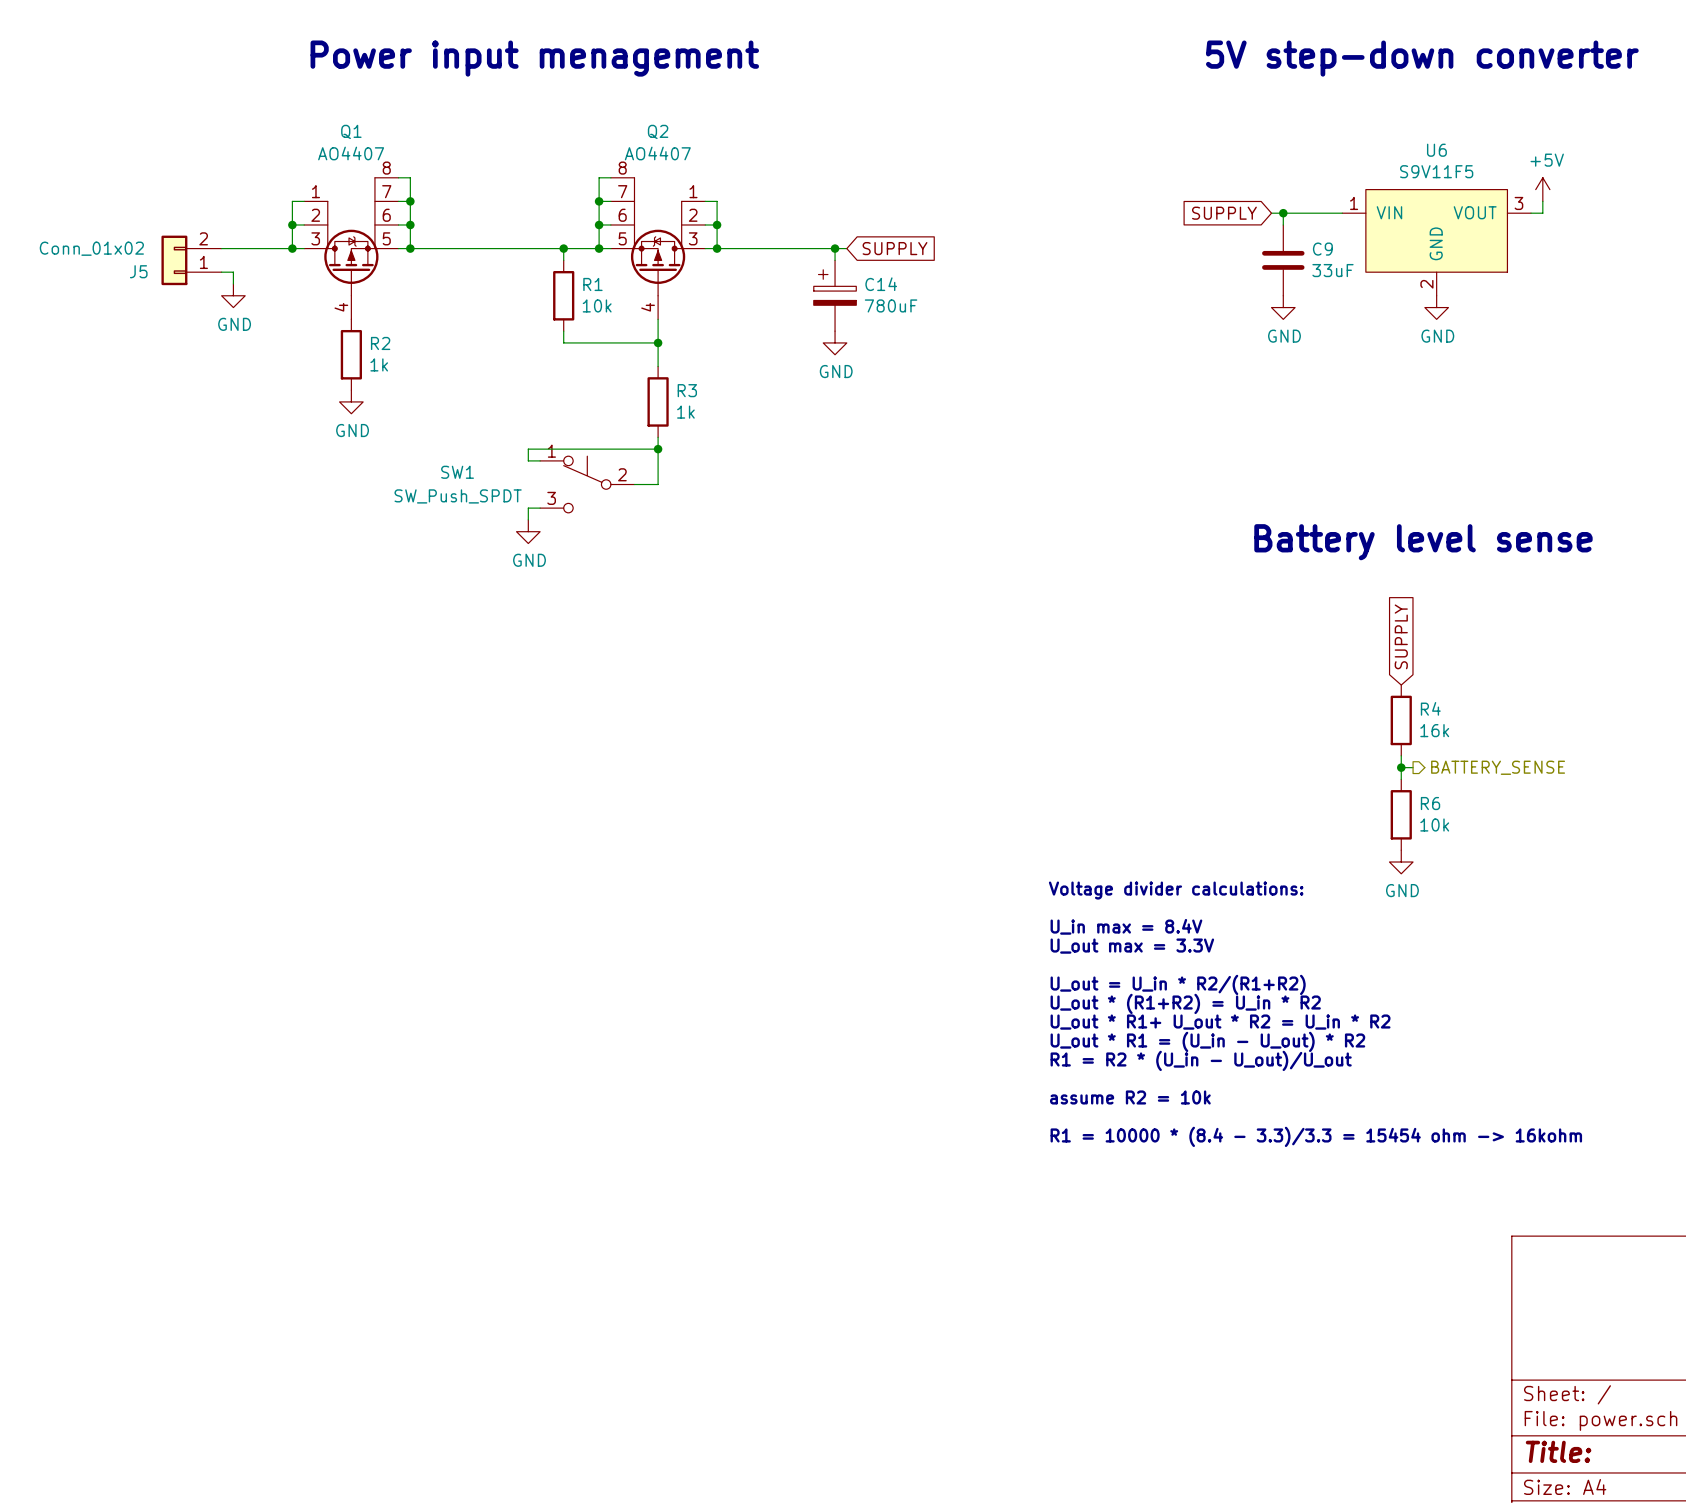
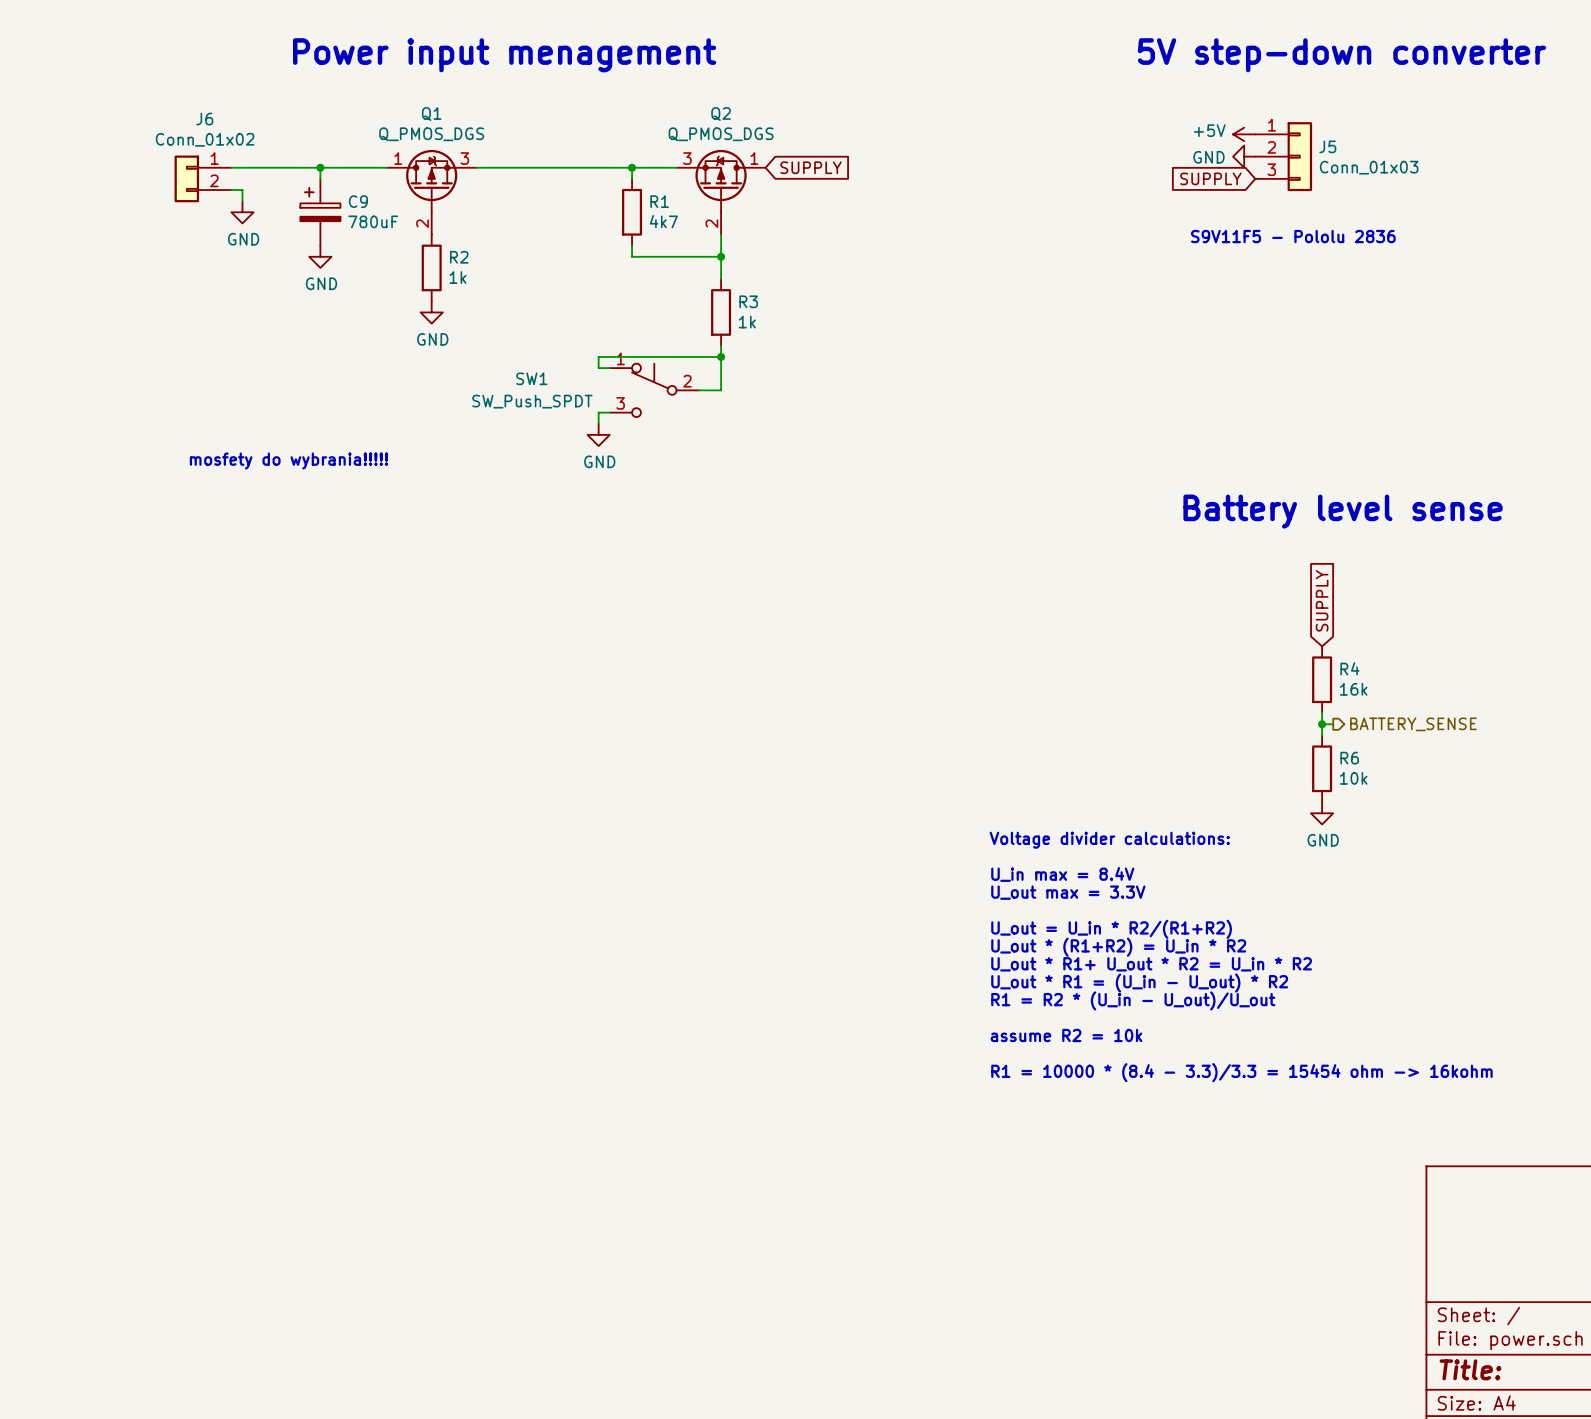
Q1 name position: Q1 (351, 131) -> Q1 (431, 114)
Q2 name position: Q2 (658, 131) -> Q2 (721, 114)
Q1 value: AO4407 (351, 153) -> Q_PMOS_DGS (431, 134)
Q2 value: AO4407 (657, 153) -> Q_PMOS_DGS (721, 134)
power symbol: none -> GND (1244, 156)
wire: none -> (231, 167) (376, 167)
Q1 symbol: [304, 177, 399, 320] -> [387, 149, 477, 235]
wire: none -> (320, 167) (320, 178)
junction: none -> (320, 167)
wire: (410, 177) (410, 248) -> none
wire: (599, 177) (599, 248) -> (565, 167) (476, 167)
wire: none -> (576, 167) (676, 167)
Q2 symbol: [610, 177, 706, 320] -> [676, 149, 766, 235]
junction: none -> (632, 167)
J6: none -> Conn_01x02 (202, 178)
power symbol rotation: 0° (1542, 189) -> 90° counterclockwise (1244, 134)
power symbol position: +5V (1542, 189) -> +5V (1244, 134)
wire: (304, 201) (292, 201) (292, 248) -> none
wire: (398, 201) (410, 201) -> none
junction: (410, 201) -> none
wire: (599, 201) (610, 201) -> none
junction: (599, 201) -> none
wire: (705, 201) (717, 201) (717, 248) -> none
wire: (1542, 201) (1542, 213) (1531, 213) -> none
global label position: SUPPLY (1224, 213) -> SUPPLY (1210, 178)
wire: (1271, 213) (1342, 213) -> none
wire: (1283, 213) (1283, 224) -> none
junction: (1283, 213) -> none
power symbol: none -> GND (242, 212)
wire: (292, 224) (304, 224) -> none
junction: (292, 224) -> none
wire: (398, 224) (410, 224) -> none
junction: (410, 224) -> none
wire: (599, 224) (610, 224) -> none
junction: (599, 224) -> none
wire: (705, 224) (717, 224) -> none
junction: (717, 224) -> none
C9 symbol: [1262, 224, 1305, 296] -> [300, 178, 341, 246]
J5 symbol: [161, 235, 222, 286] -> [1255, 122, 1313, 192]
U6: S9V11F5 (1436, 242) -> none
J5 value: Conn_01x02 (91, 248) -> Conn_01x03 (1369, 167)
wire: (221, 248) (304, 248) -> none
junction: (292, 248) -> none
wire: (398, 248) (610, 248) -> none
junction: (410, 248) -> none
wire: (563, 248) (563, 260) -> (632, 167) (632, 178)
junction: (563, 248) -> none
junction: (599, 248) -> none
wire: (705, 248) (846, 248) -> none
junction: (717, 248) -> none
wire: (835, 248) (835, 260) -> none
junction: (835, 248) -> none
global label position: SUPPLY (895, 248) -> SUPPLY (811, 167)
text: none -> S9V11F5 - Pololu 2836 (1293, 236)
C9 value: 33uF (1332, 270) -> 780uF (373, 221)
J5 name position: J5 (138, 271) -> J5 (1327, 146)
wire: (221, 272) (233, 272) (233, 283) -> (231, 190) (242, 190) (242, 201)
power symbol: none -> GND (320, 256)
junction: none -> (721, 256)
power symbol: GND (233, 295) -> none
R1 position: (563, 295) -> (632, 212)
C14: 780uF (835, 295) -> none
R1 value: 10k (597, 305) -> 4k7 (663, 221)
power symbol: GND (1283, 307) -> none
power symbol: GND (1436, 307) -> none
wire: (658, 319) (658, 366) -> (721, 234) (721, 279)
power symbol: none -> GND (431, 312)
wire: (563, 331) (563, 342) (658, 342) -> (632, 245) (632, 256) (721, 256)
junction: (658, 342) -> none
power symbol: GND (835, 342) -> none
R2 position: (351, 354) -> (431, 267)
junction: none -> (721, 356)
power symbol: GND (351, 401) -> none
R3 position: (658, 401) -> (721, 312)
wire: (658, 437) (658, 484) (634, 484) -> (721, 345) (721, 390) (698, 390)
wire: (658, 449) (528, 449) (528, 460) (540, 460) -> (721, 356) (598, 356) (598, 368) (609, 368)
junction: (658, 449) -> none
power symbol: none -> GND (598, 434)
SW1 position: (587, 484) -> (654, 390)
text: none -> mosfety do wybrania!!!!! (288, 461)
wire: (540, 508) (528, 508) (528, 519) -> (609, 412) (598, 412) (598, 423)
power symbol: GND (528, 531) -> none

